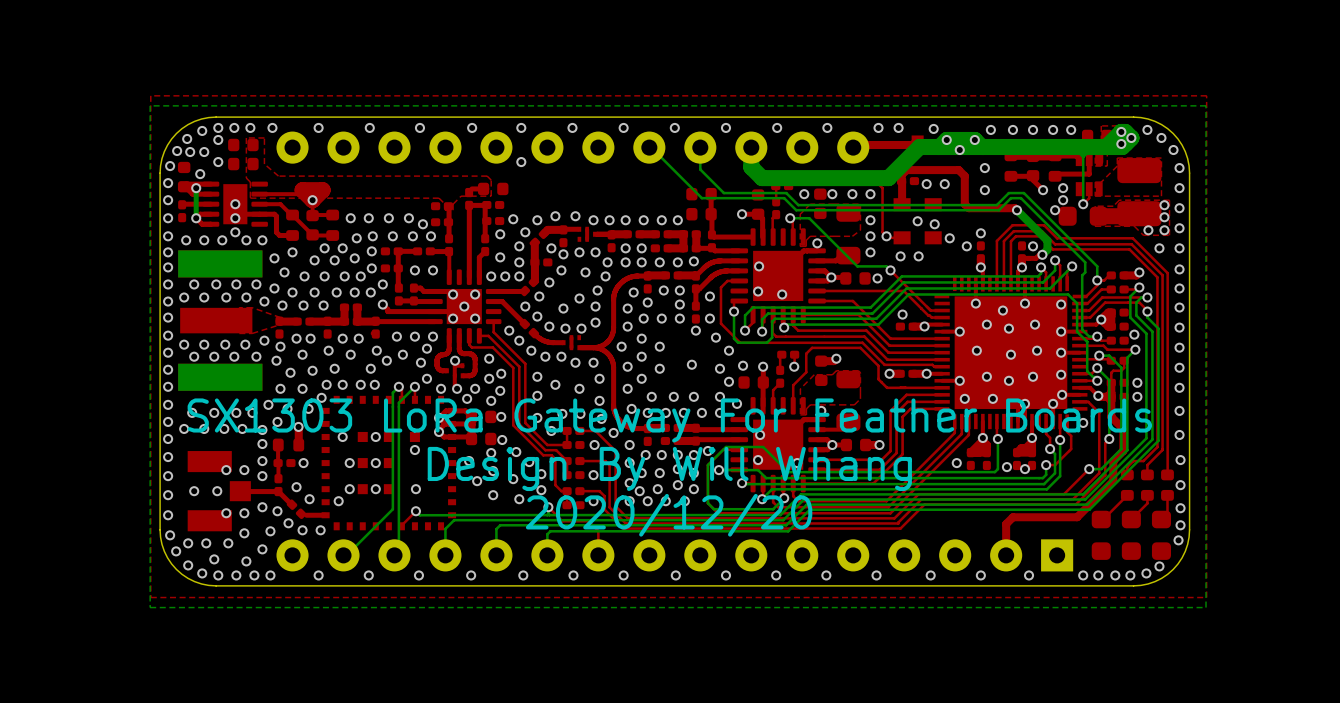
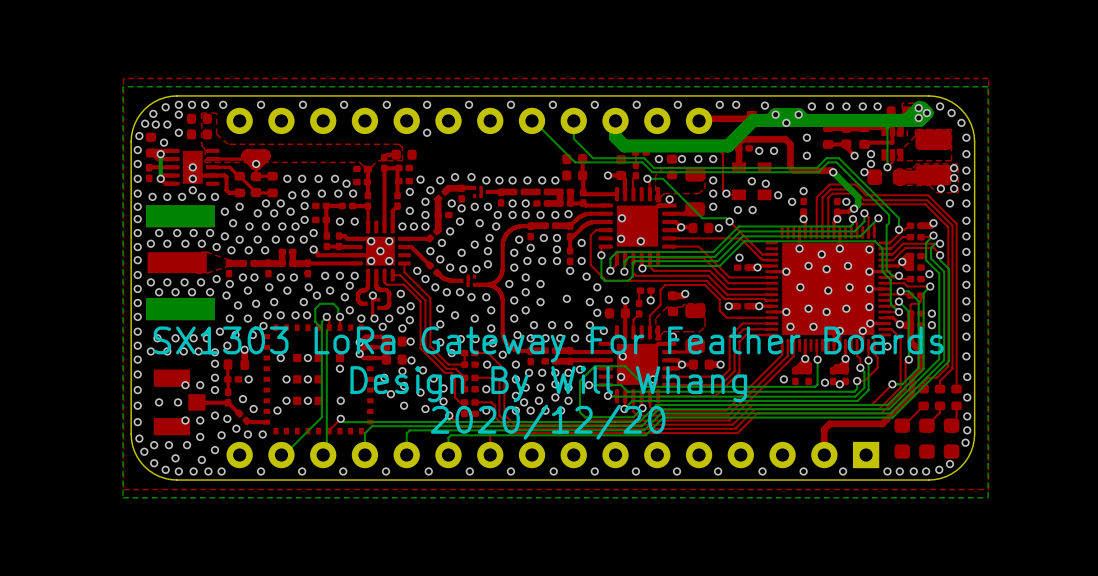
bottom track: none -> (338, 316) (338, 308) (333, 303) (320, 303) (315, 308) (315, 321) (321, 328)
bottom track: (414, 386) (398, 402) -> none

